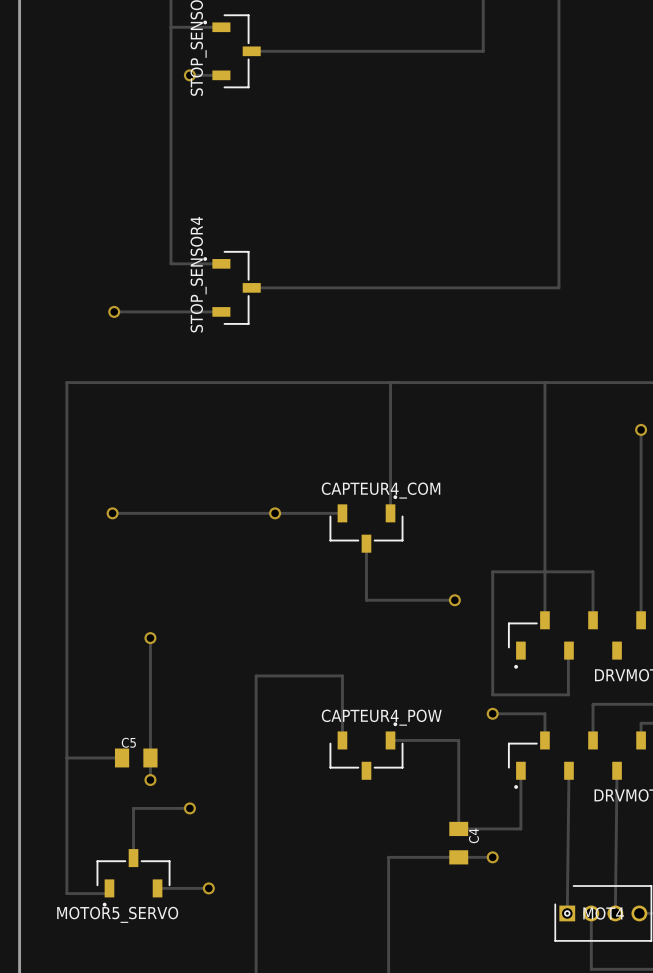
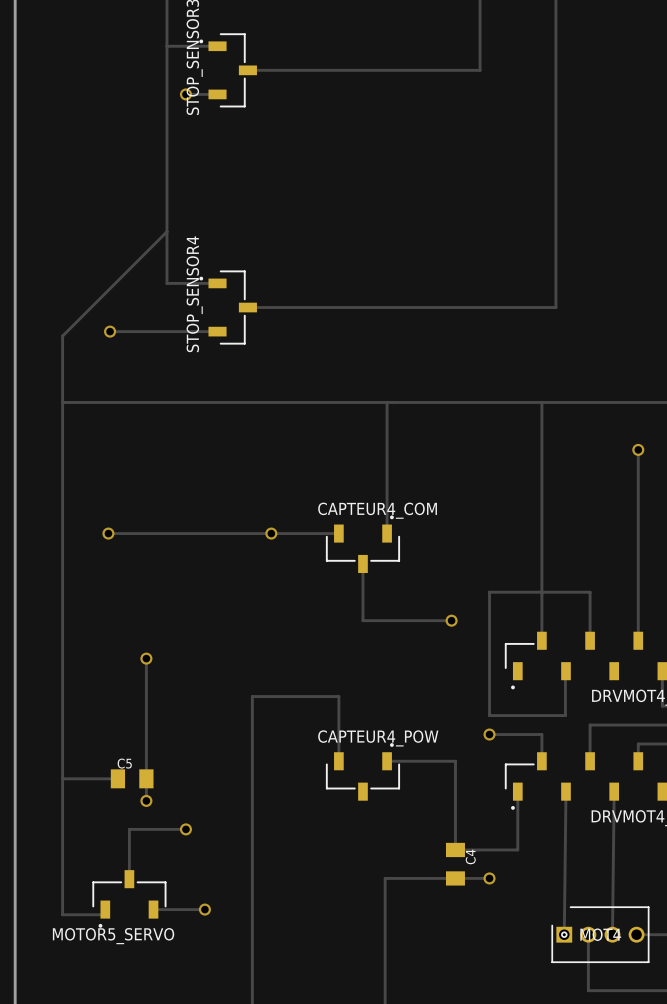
track: none -> (166, 231) (62, 336) (62, 402)

